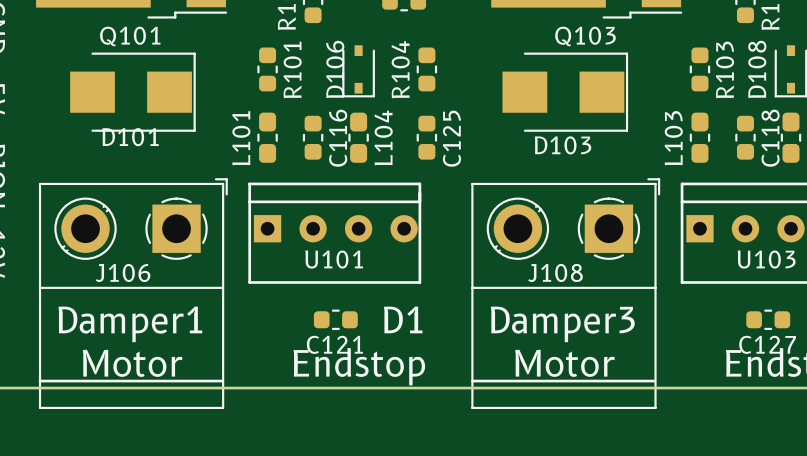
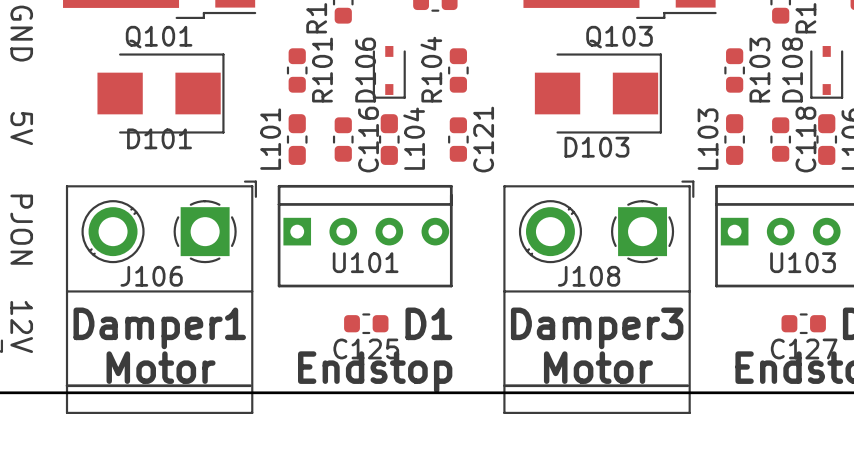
C125 name: C125 (451, 138) -> C121 (483, 139)
C121 name: C121 (334, 344) -> C125 (366, 348)

